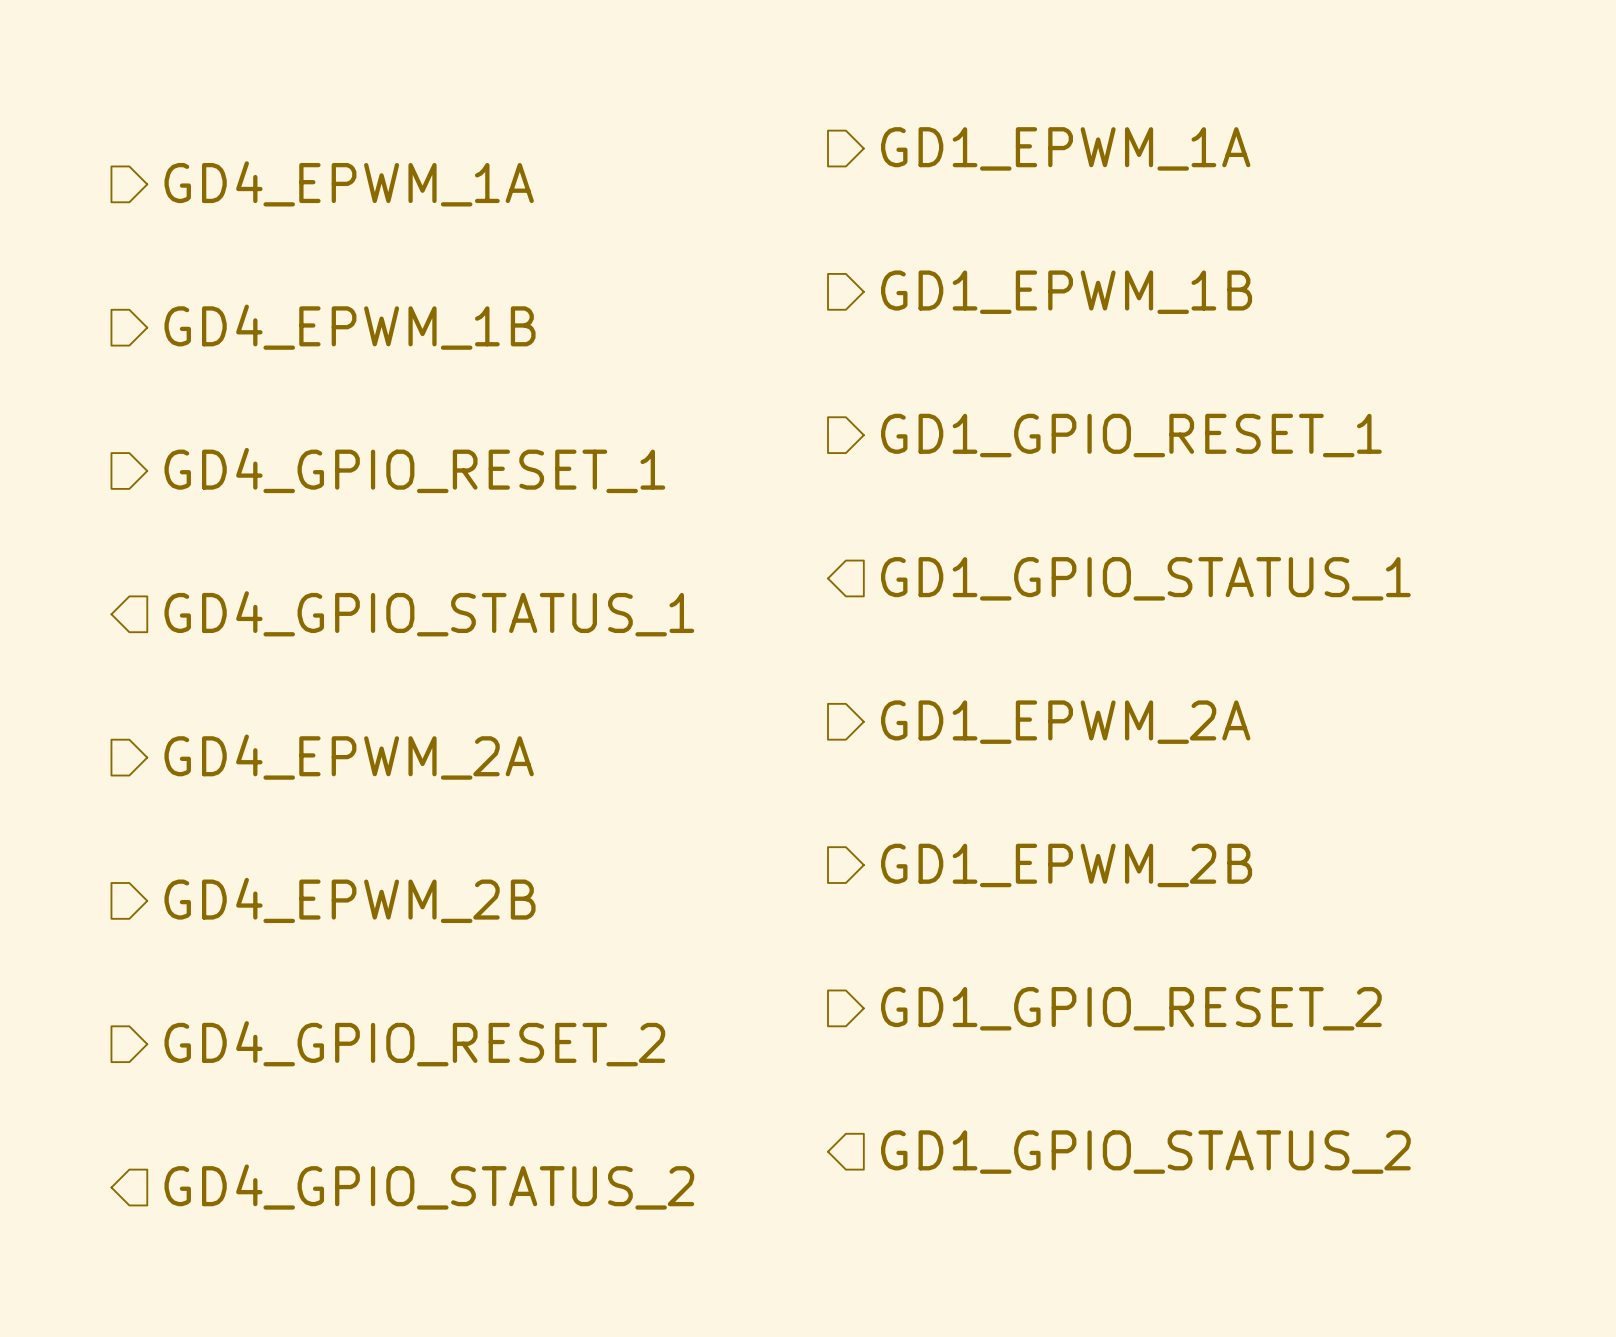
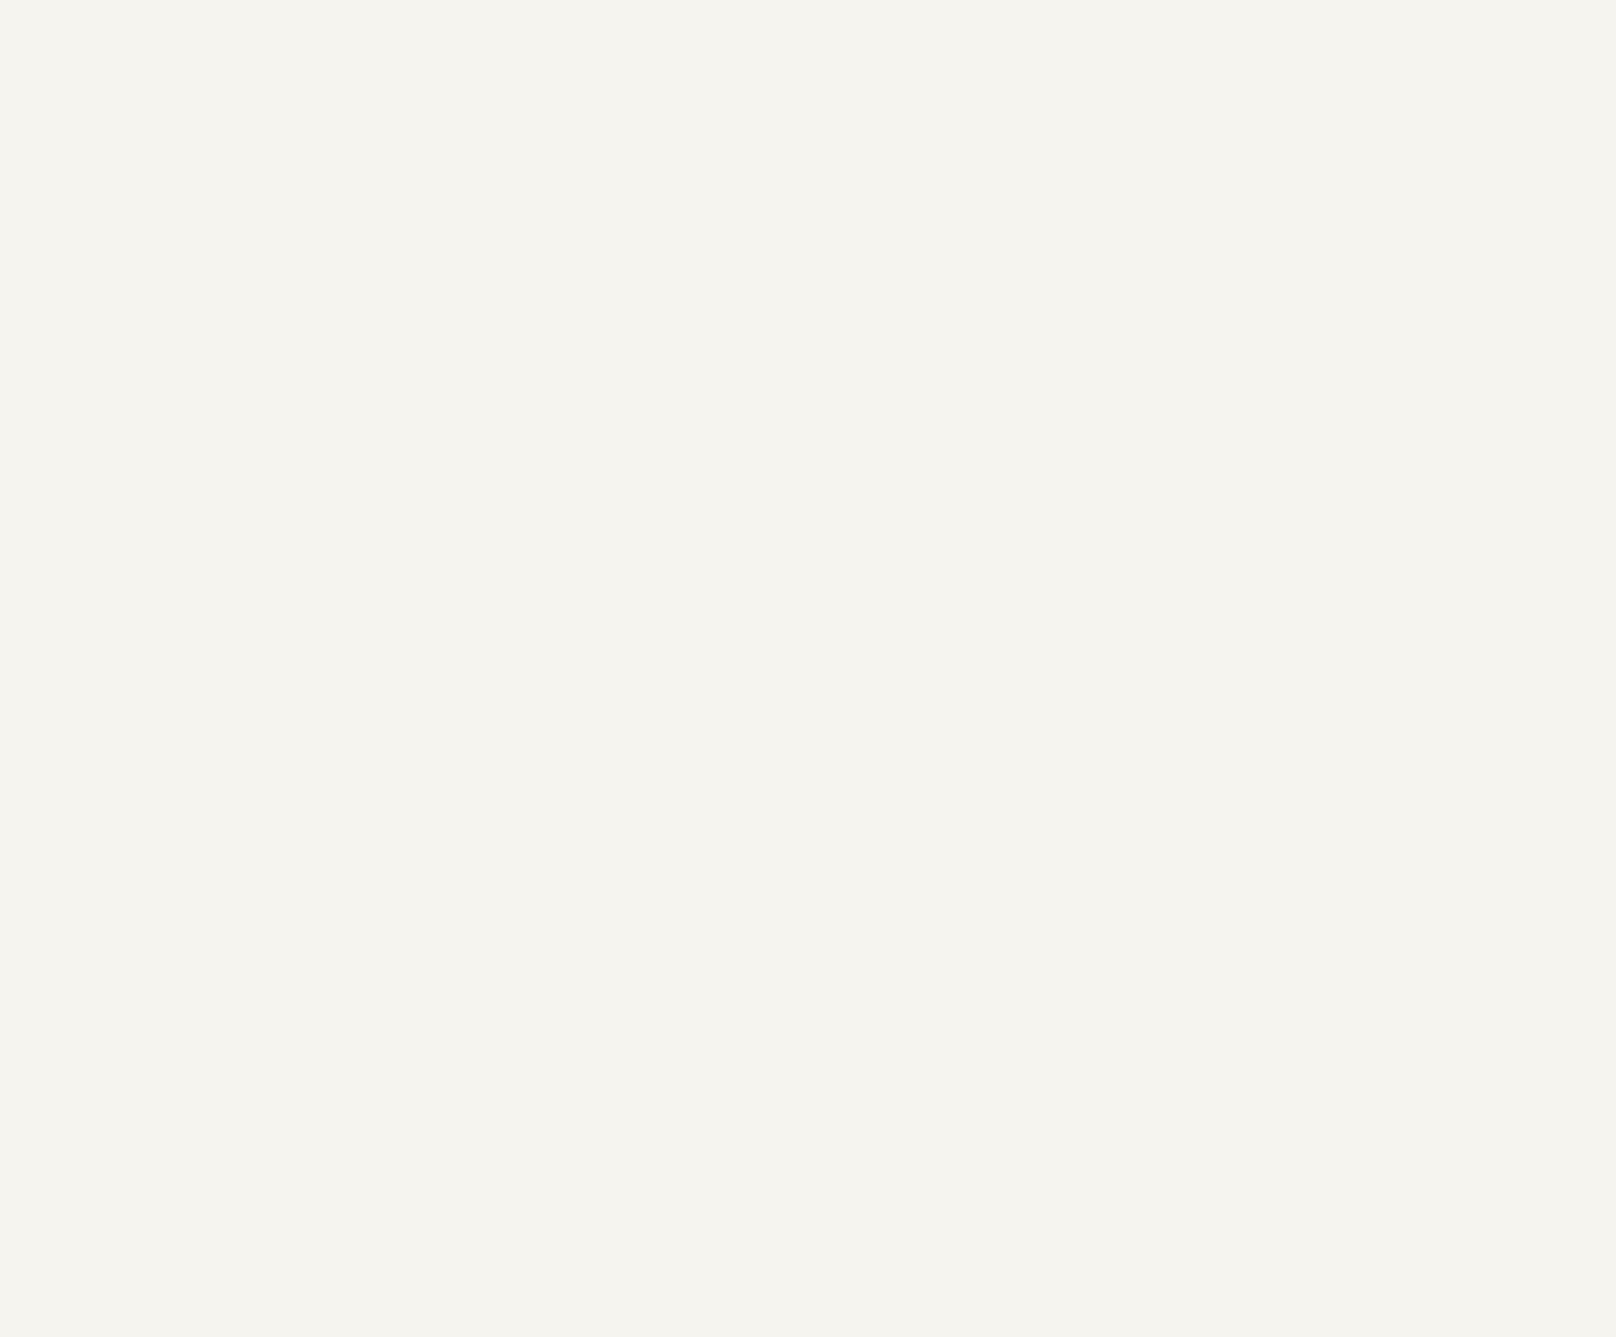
hierarchical label: GD1_EPWM_1A (1065, 148) -> none
hierarchical label: GD4_EPWM_1A (349, 183) -> none
hierarchical label: GD1_EPWM_1B (1066, 292) -> none
hierarchical label: GD4_EPWM_1B (350, 327) -> none
hierarchical label: GD1_GPIO_RESET_1 (1131, 435) -> none
hierarchical label: GD4_GPIO_RESET_1 (414, 470) -> none
hierarchical label: GD1_GPIO_STATUS_1 (1145, 578) -> none
hierarchical label: GD4_GPIO_STATUS_1 (429, 613) -> none
hierarchical label: GD1_EPWM_2A (1065, 722) -> none
hierarchical label: GD4_EPWM_2A (349, 757) -> none
hierarchical label: GD1_EPWM_2B (1066, 865) -> none
hierarchical label: GD4_EPWM_2B (350, 900) -> none
hierarchical label: GD1_GPIO_RESET_2 (1131, 1008) -> none
hierarchical label: GD4_GPIO_RESET_2 (414, 1043) -> none
hierarchical label: GD1_GPIO_STATUS_2 (1145, 1152) -> none
hierarchical label: GD4_GPIO_STATUS_2 (429, 1187) -> none

